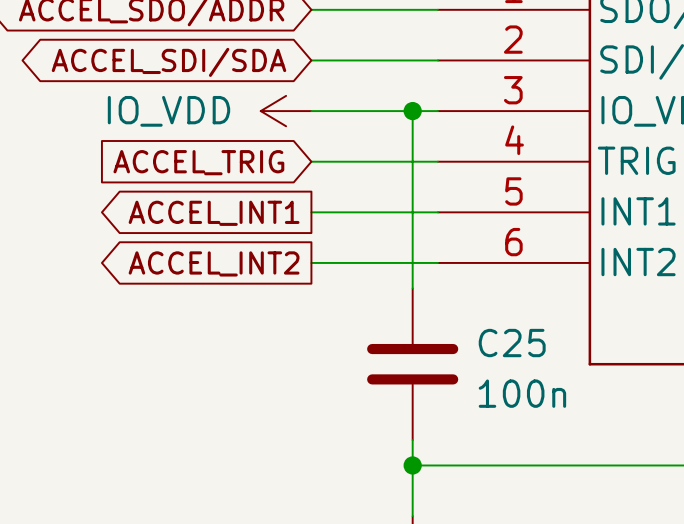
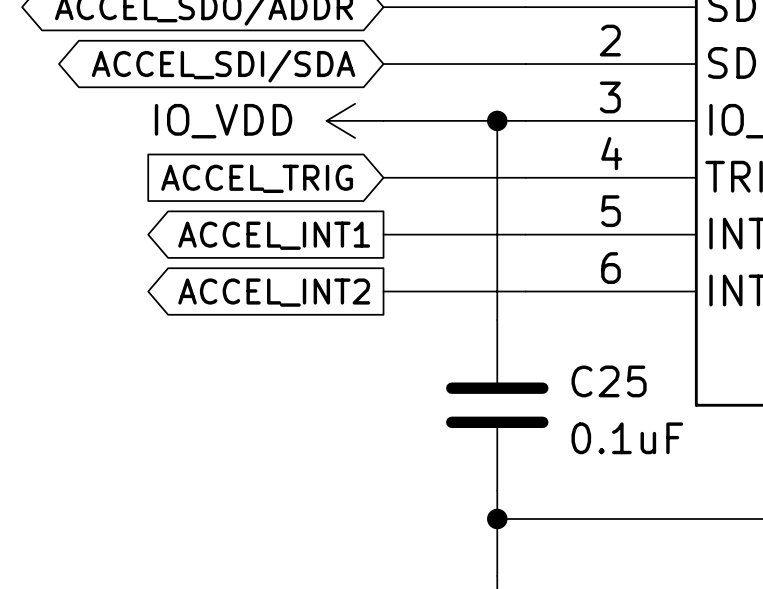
C25 value: 100n (522, 393) -> 0.1uF (627, 438)

